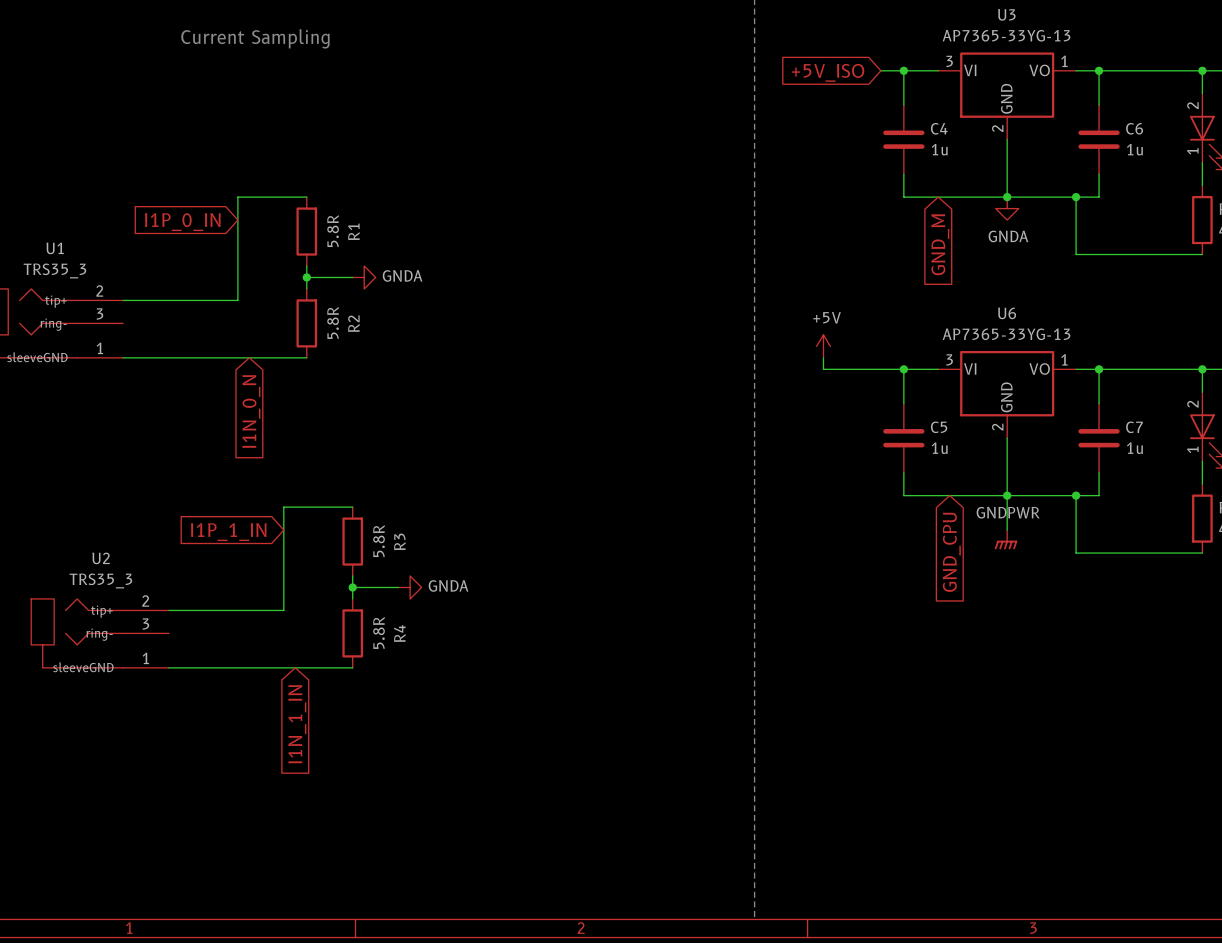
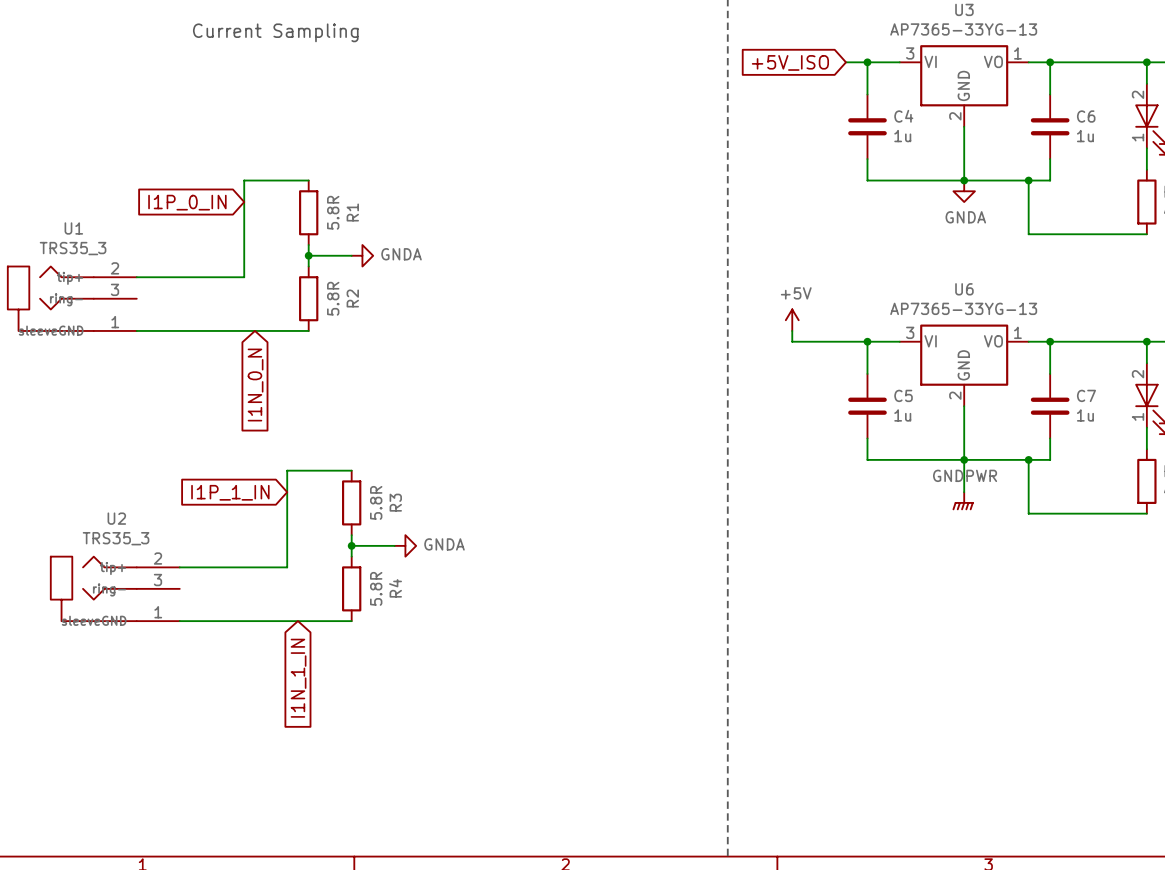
global label: GND_M (940, 244) -> none
global label: GND_CPU (951, 552) -> none

